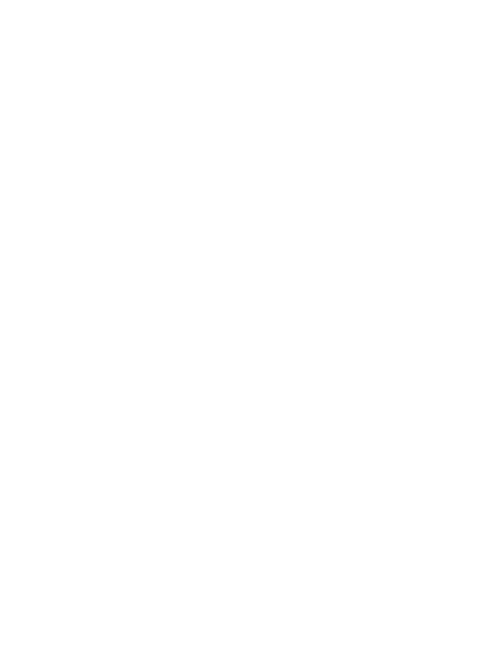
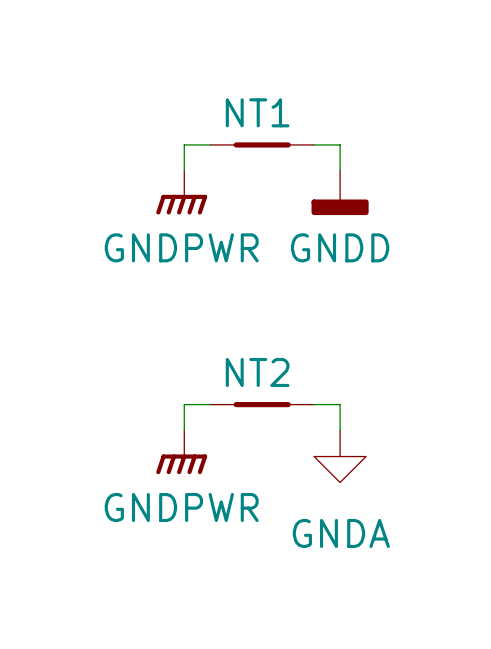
wire: none -> (210, 144) (184, 144) (184, 170)
NT1: none -> (262, 144)
wire: none -> (314, 144) (340, 144) (340, 170)
power symbol: none -> GNDPWR (181, 192)
power symbol: none -> GNDD (340, 193)
wire: none -> (210, 404) (184, 404) (184, 430)
NT2: none -> (262, 404)
wire: none -> (314, 404) (340, 404) (340, 430)
power symbol: none -> GNDPWR (181, 452)
power symbol: none -> GNDA (340, 456)

